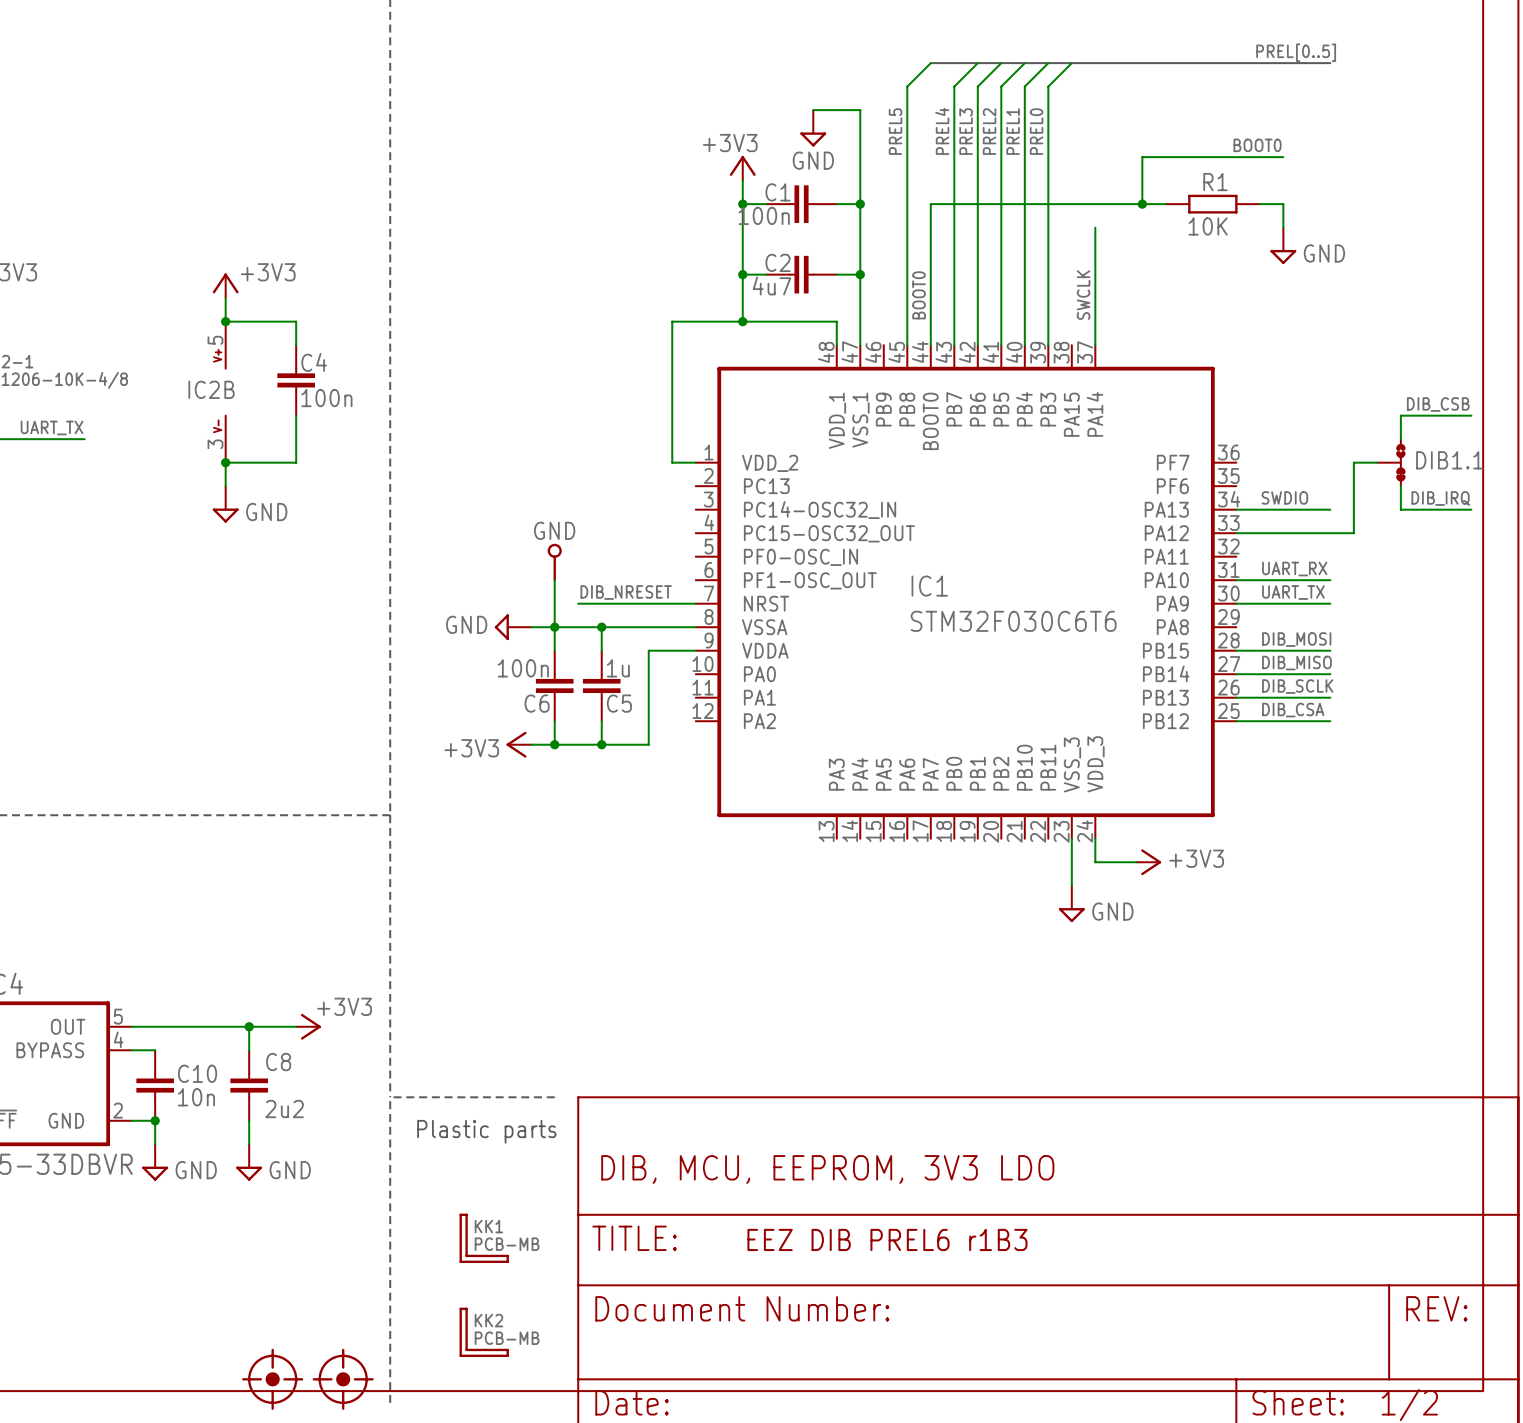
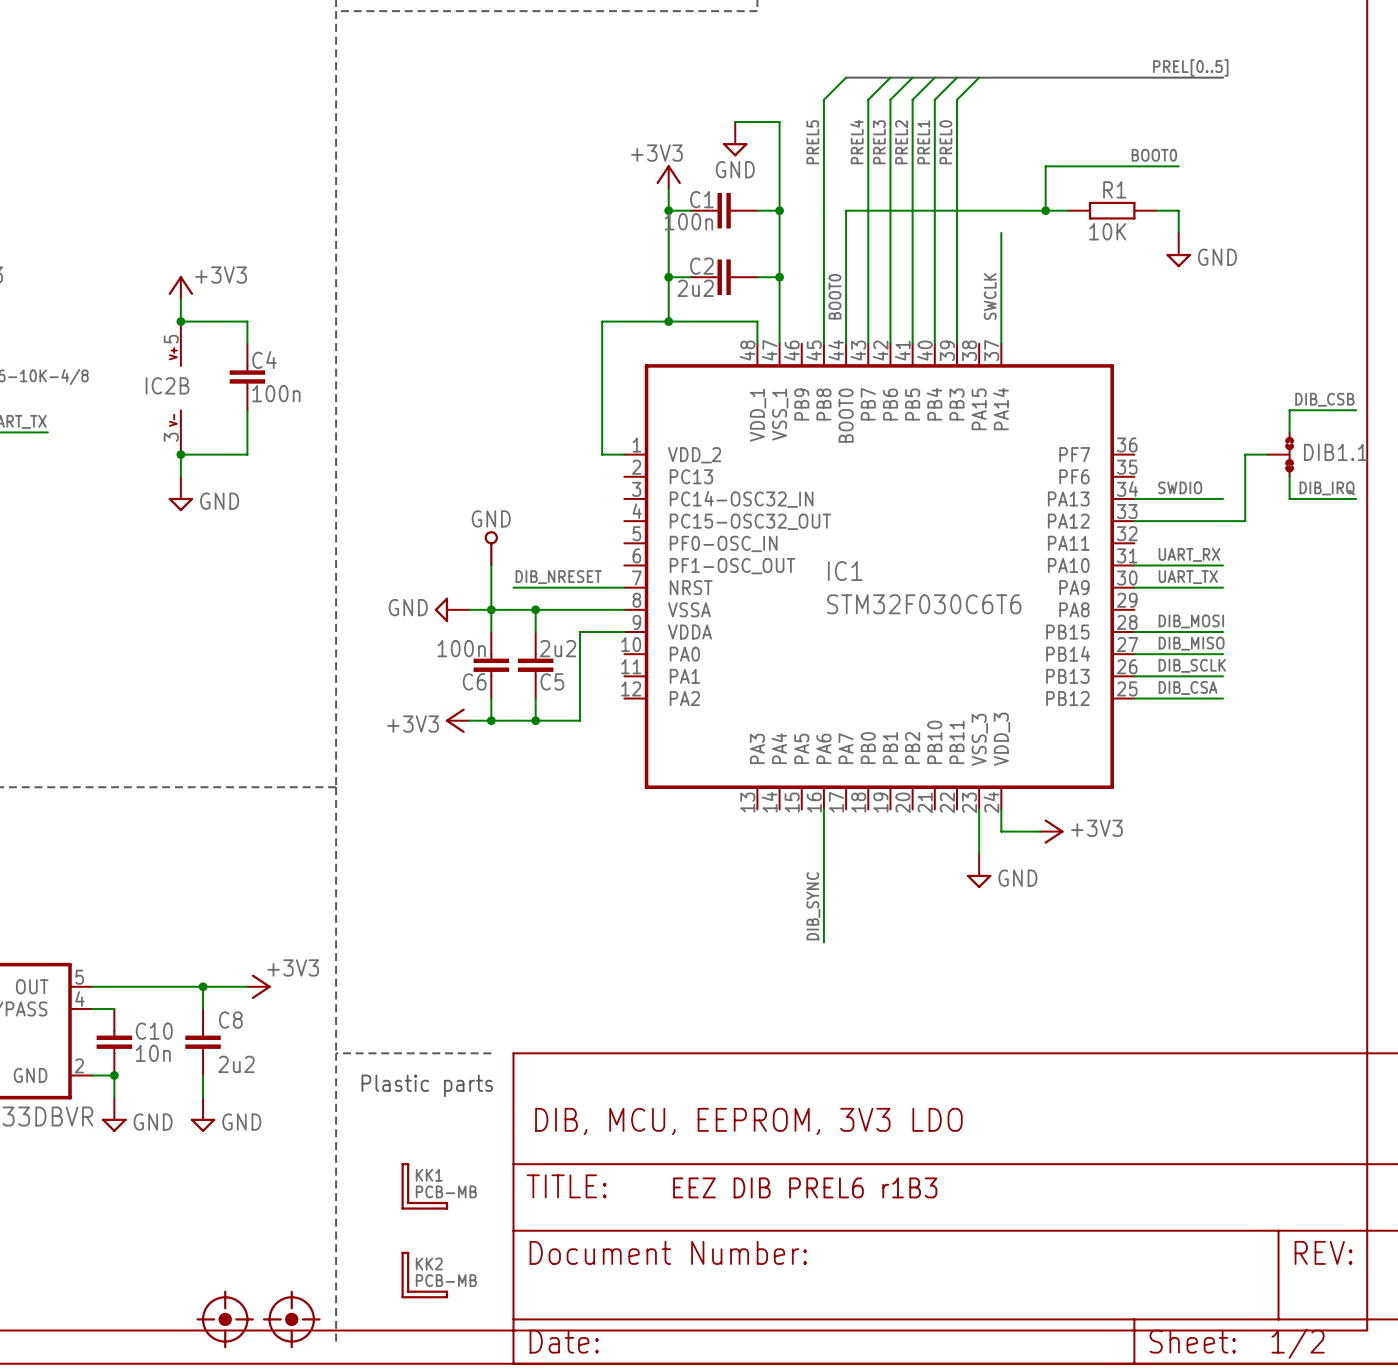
C2 value: 4u7 (771, 286) -> 2u2 (695, 288)
C5 value: 1u (618, 668) -> 2u2 (557, 648)
wire: none -> (823, 809) (823, 942)
label: none -> DIB_SYNC (813, 906)

